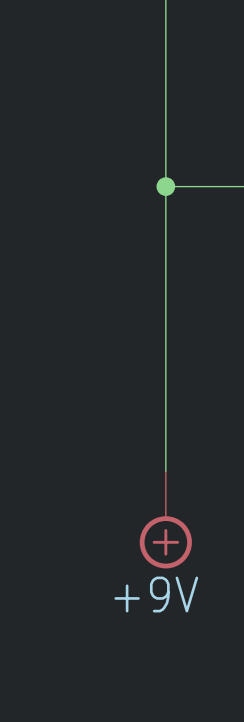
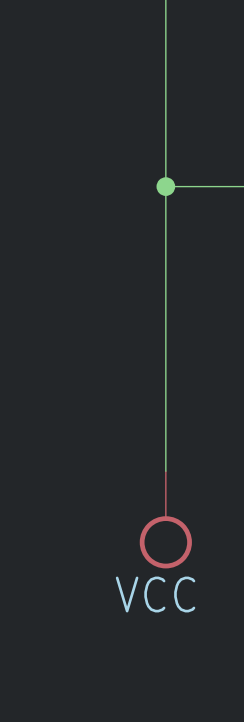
power symbol: +9V (165, 519) -> VCC (165, 519)

